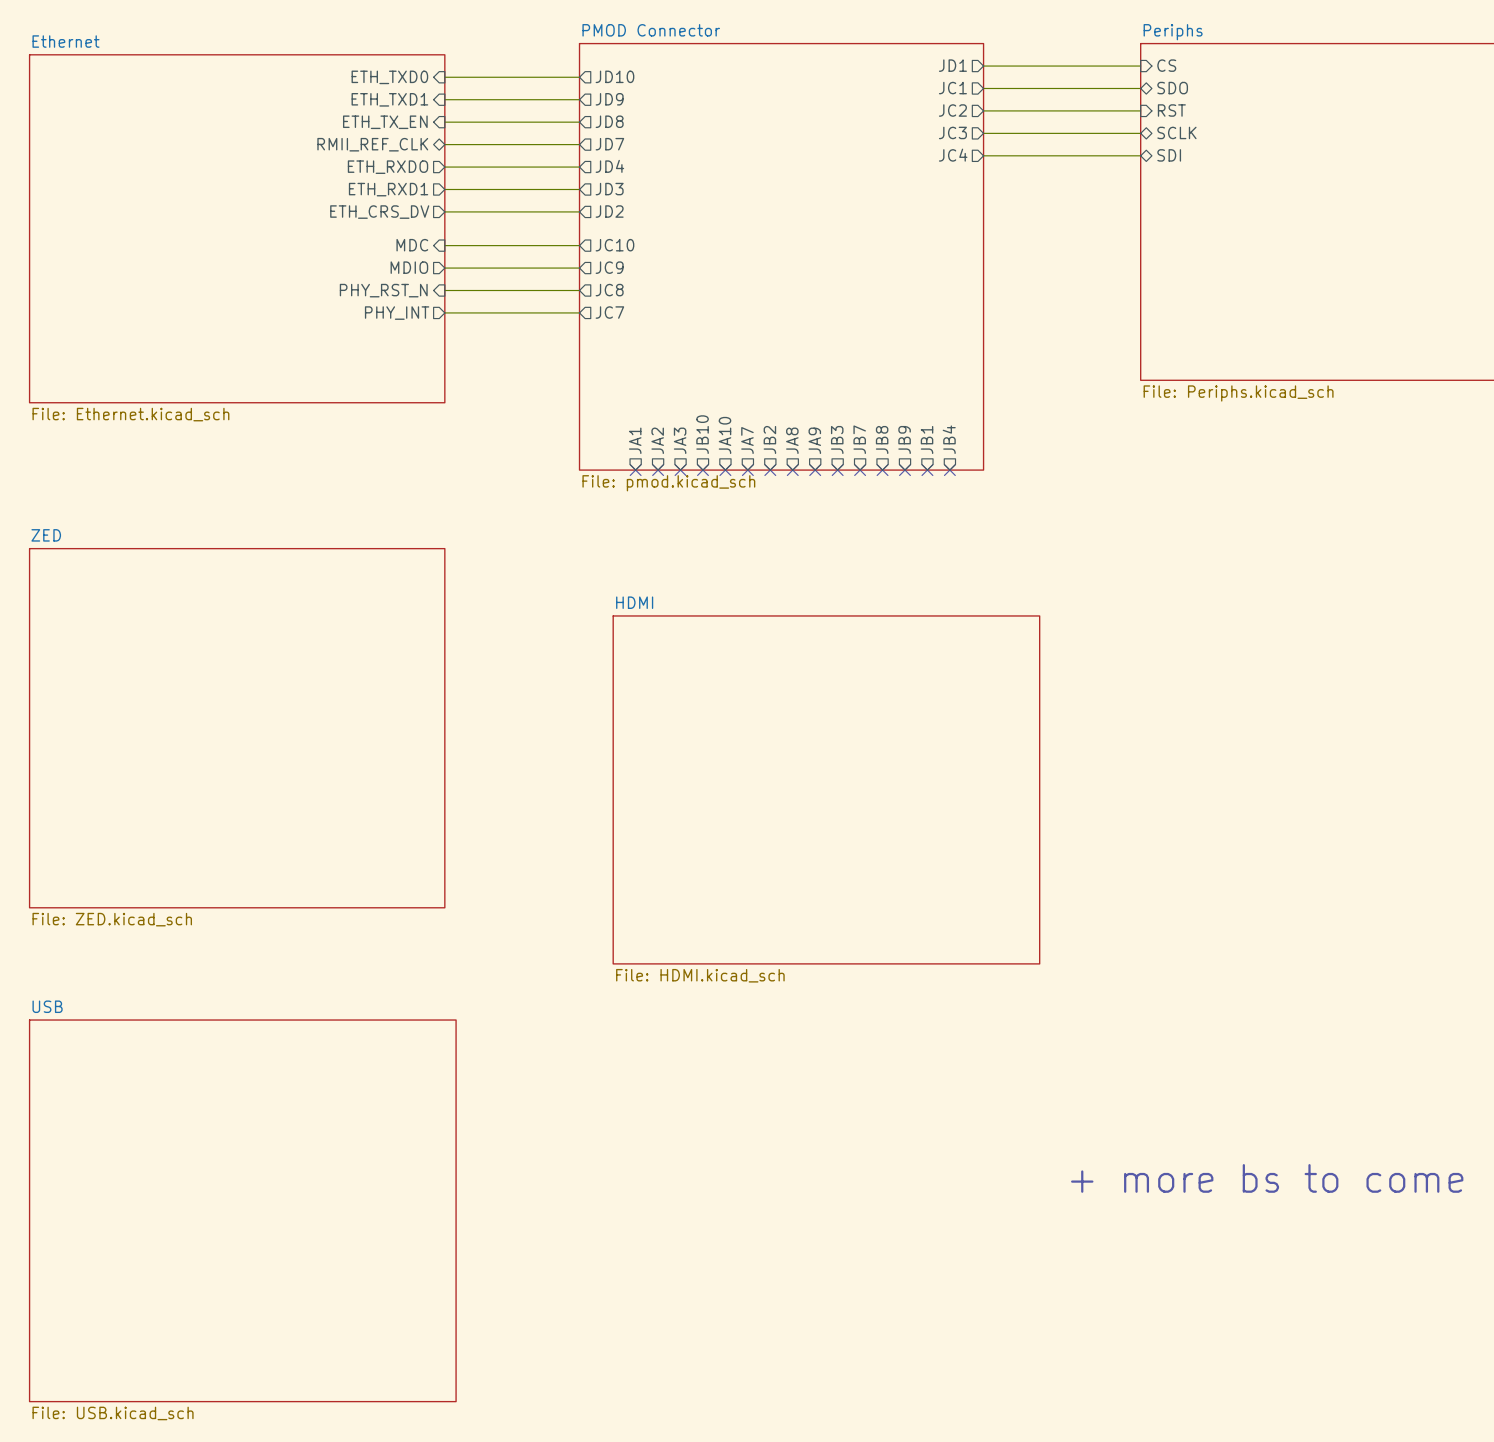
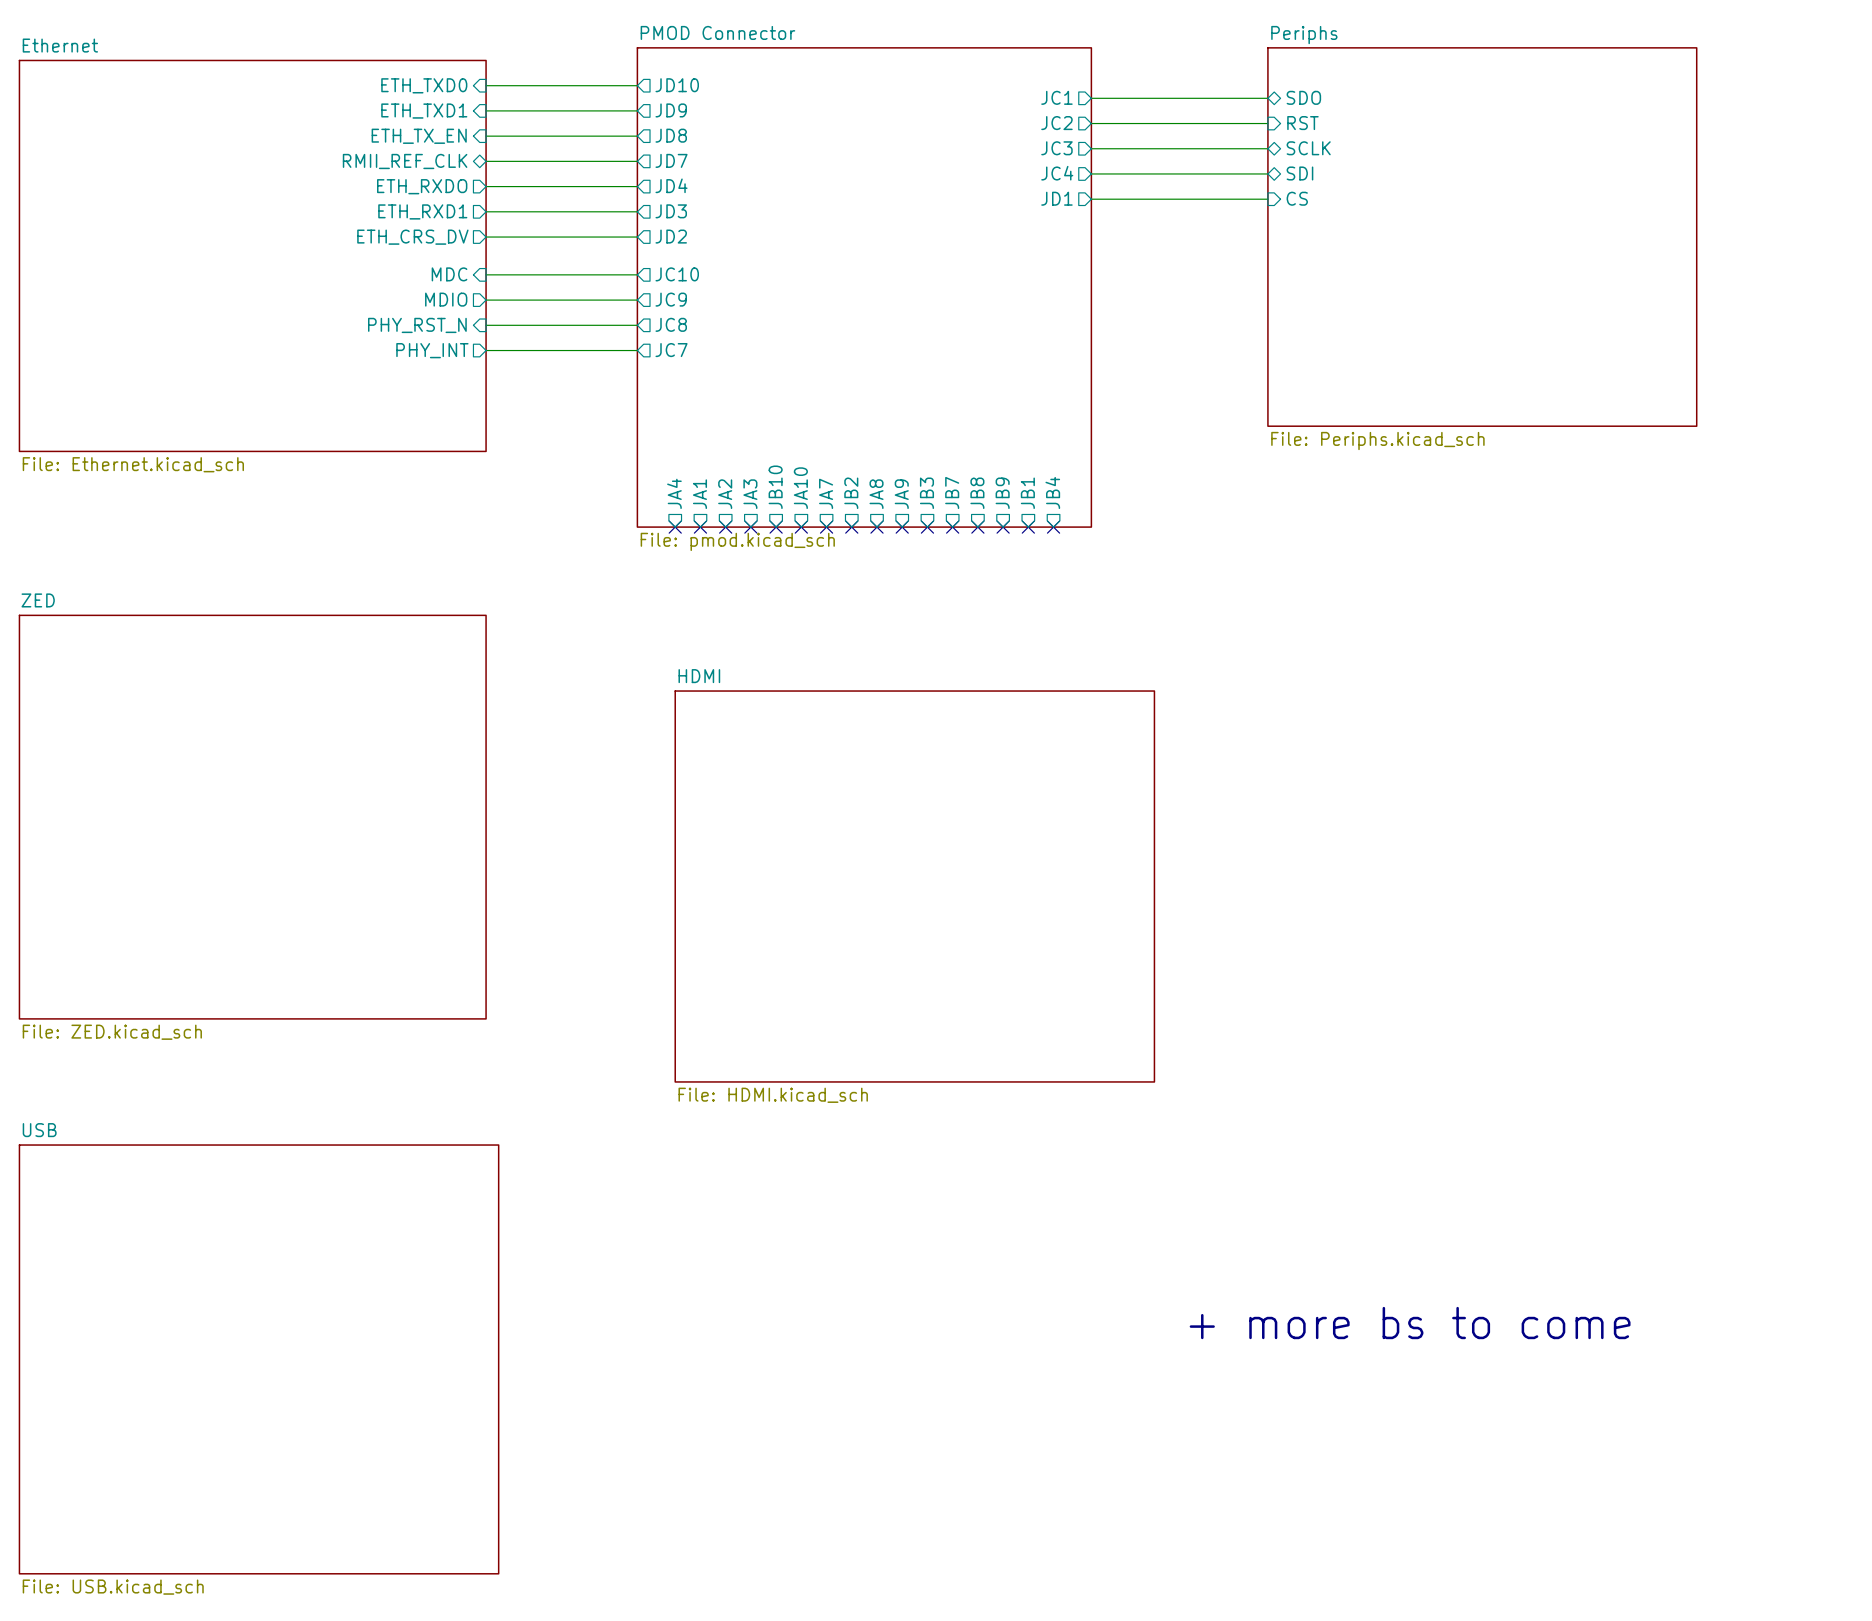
sheet pin position: JD1 (952, 65) -> JD1 (1056, 198)
sheet pin position: CS (1166, 65) -> CS (1297, 198)
wire: (983, 66) (1140, 66) -> (1091, 199) (1267, 199)
sheet pin: none -> JA4 (674, 493)
no-connect mark: none -> (675, 527)

